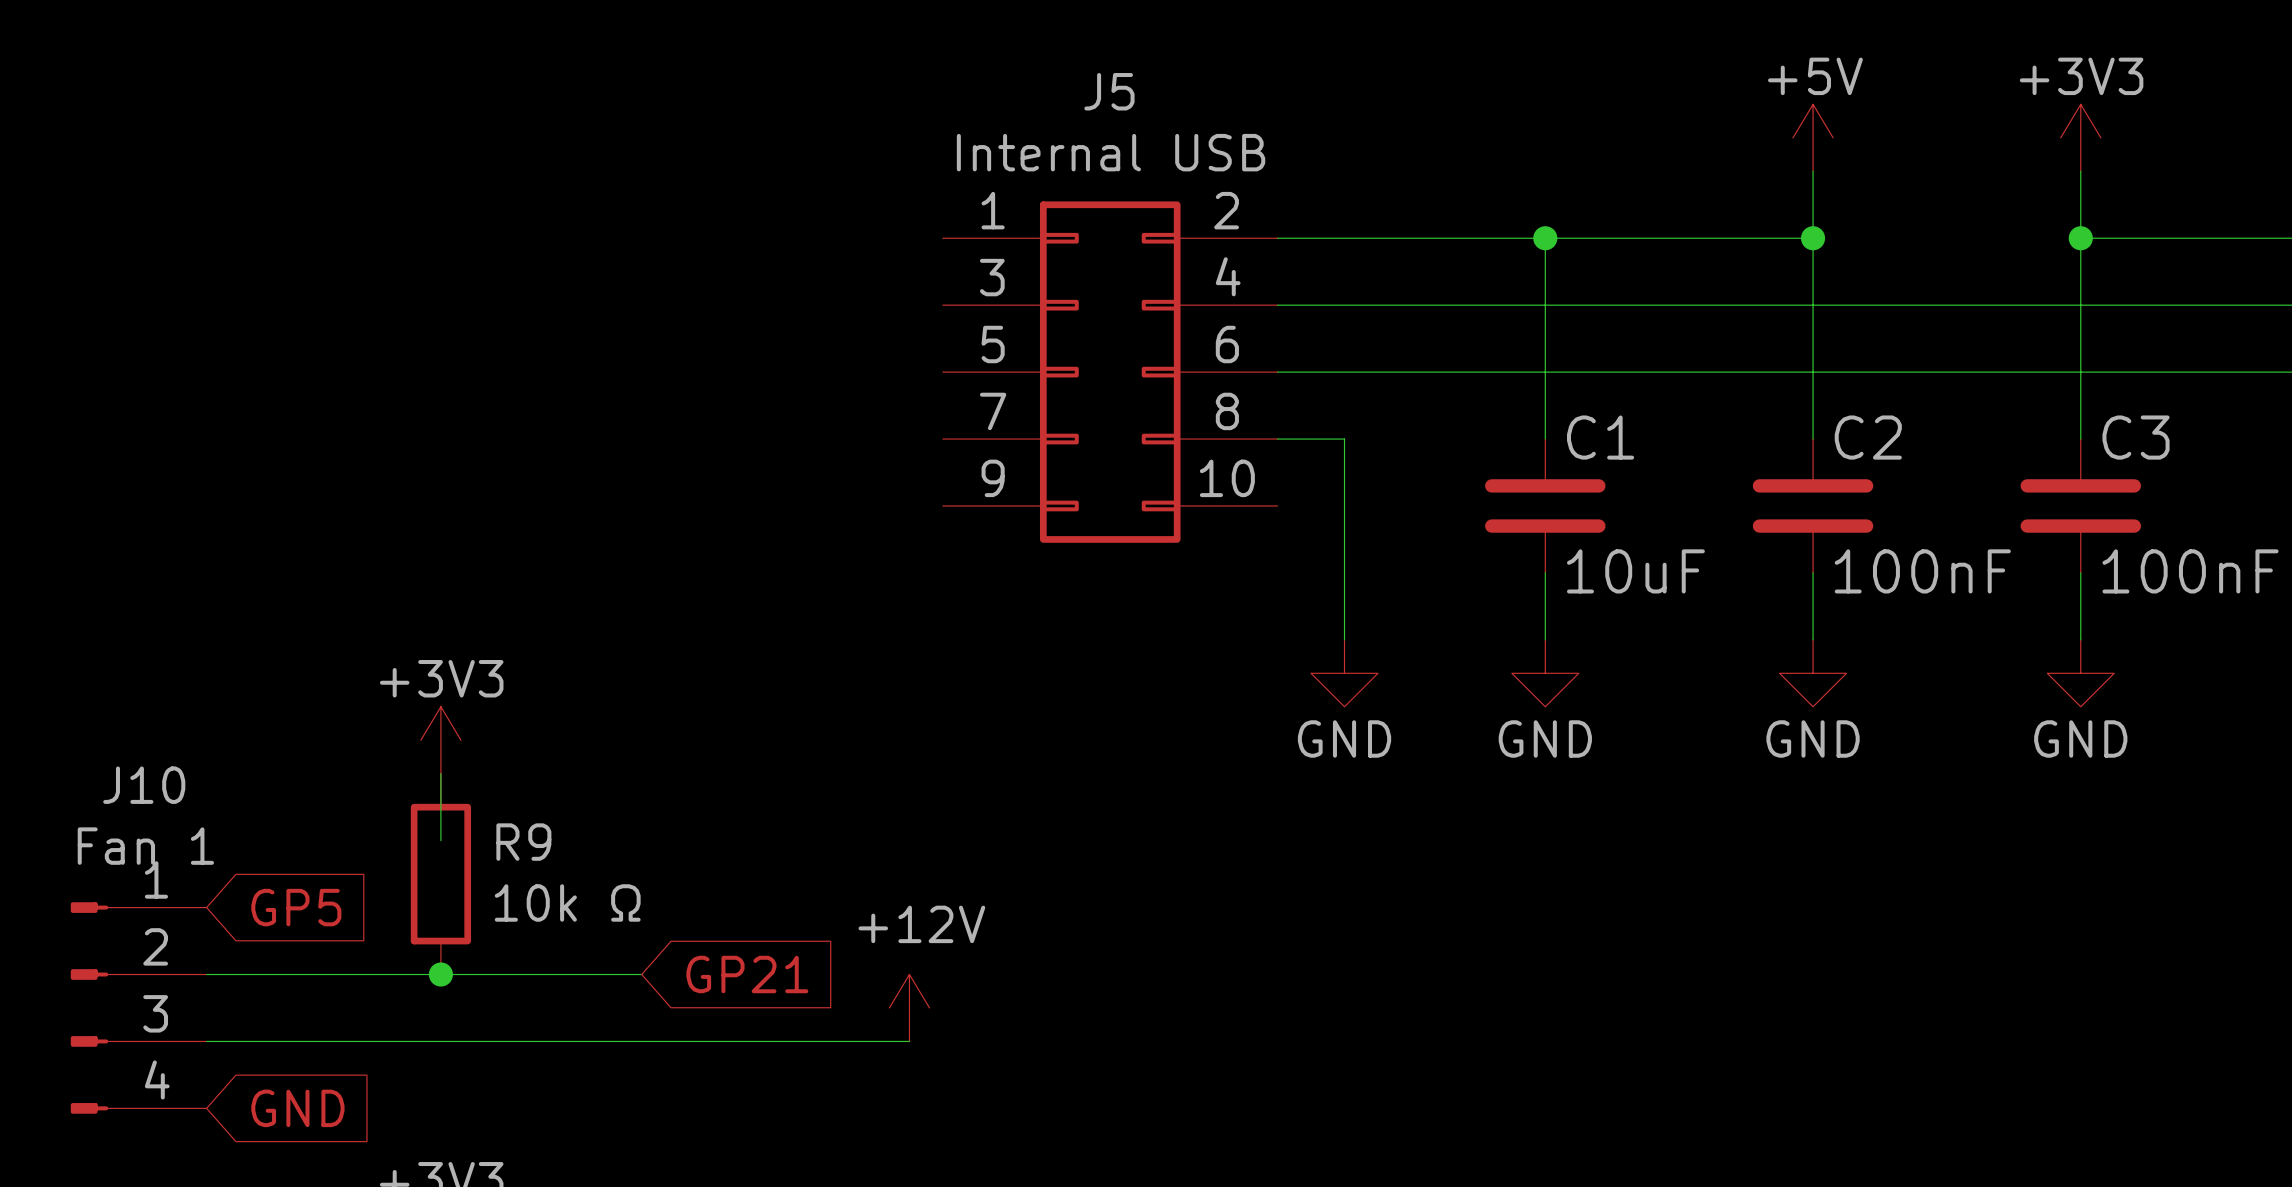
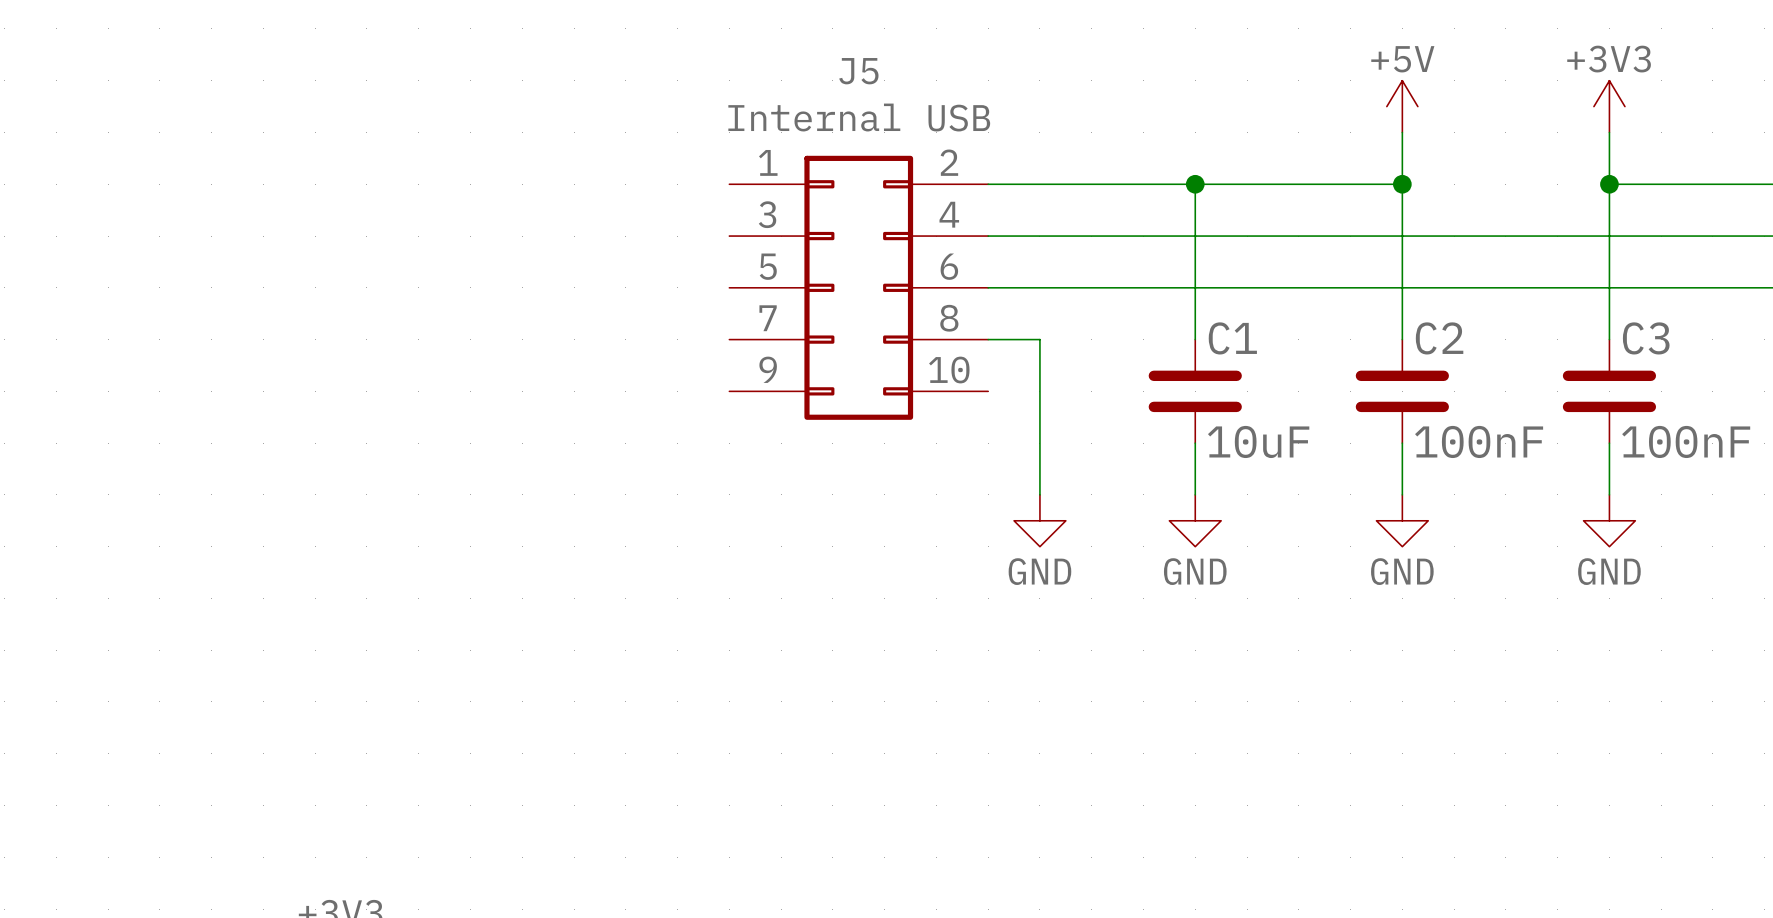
power symbol: +3V3 (440, 740) -> none
wire: (440, 773) (440, 840) -> none
R9: 10k Ω (440, 874) -> none
global label: GP5 (296, 907) -> none
wire: (206, 974) (641, 974) -> none
junction: (440, 974) -> none
global label: GP21 (747, 974) -> none
J10: Fan 1 (138, 1007) -> none
power symbol: +12V (909, 1007) -> none
wire: (206, 1041) (909, 1041) -> none
global label: GND (297, 1108) -> none

